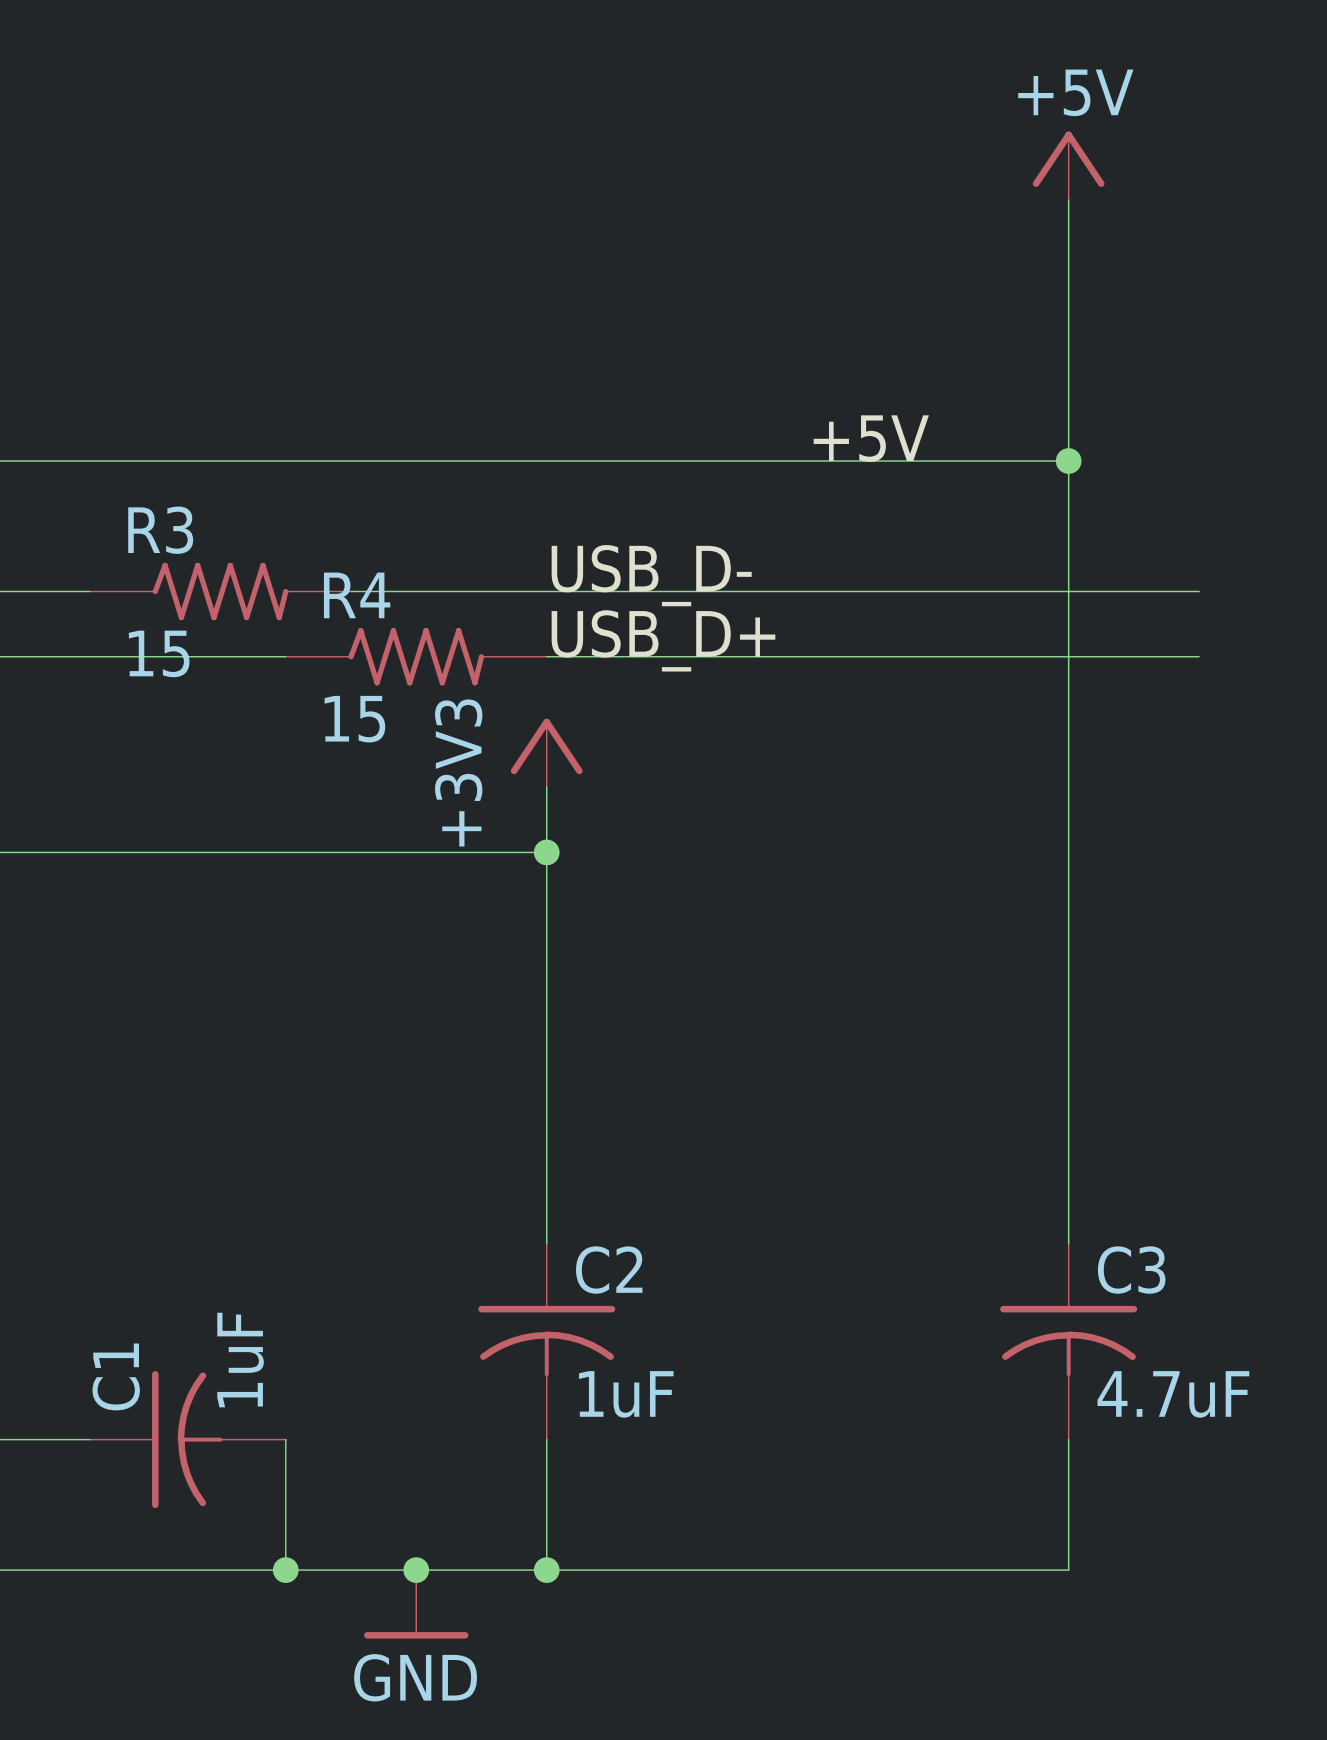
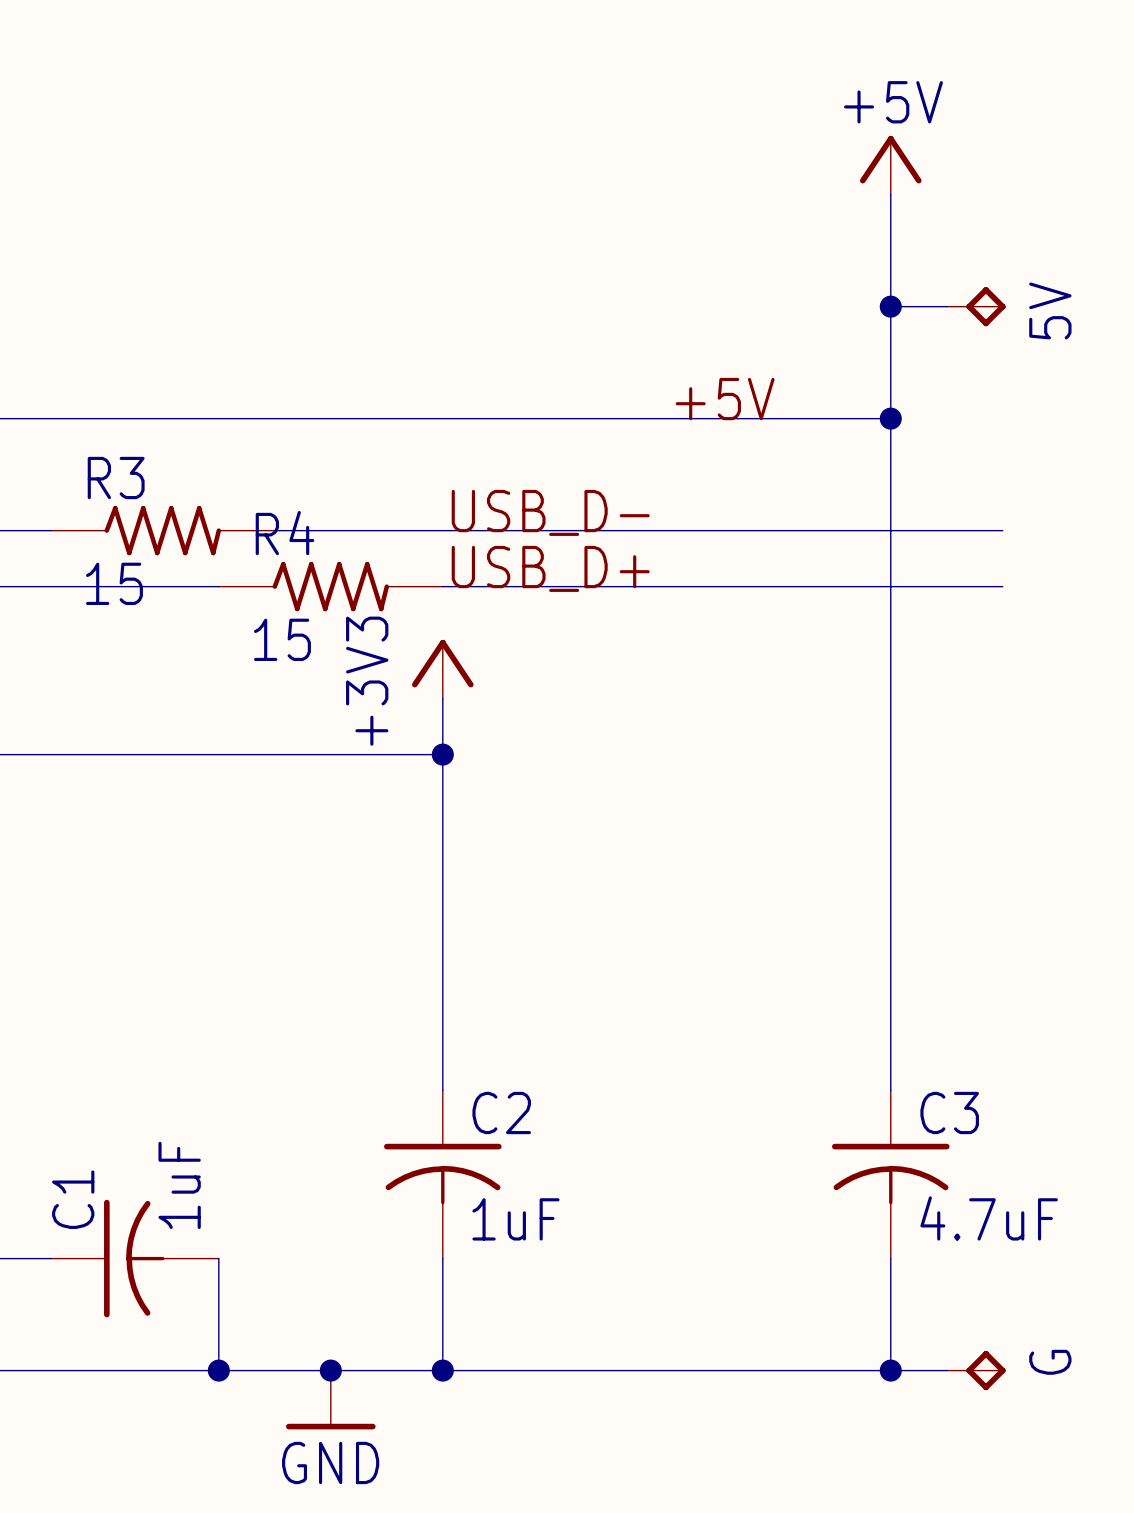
wire: none -> (890, 306) (946, 306)
junction: none -> (890, 306)
5V: none -> (976, 306)
wire: none -> (890, 1370) (946, 1370)
junction: none -> (890, 1370)
G: none -> (976, 1370)

